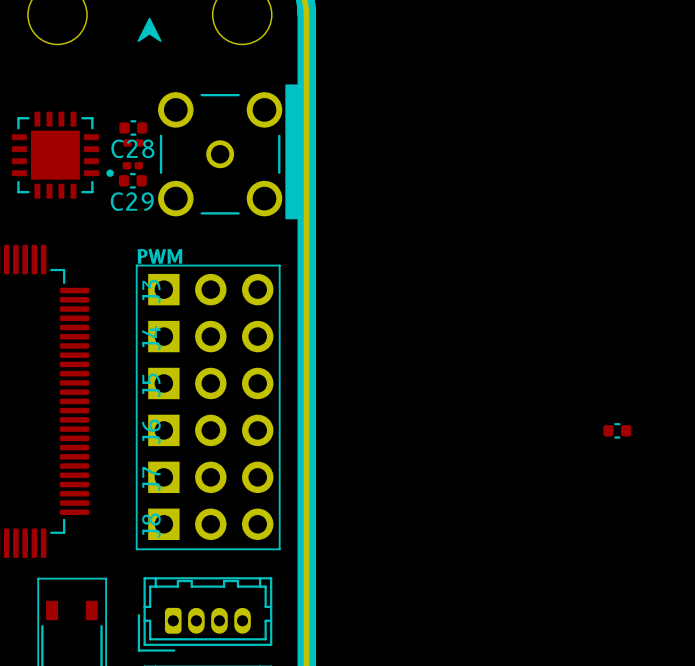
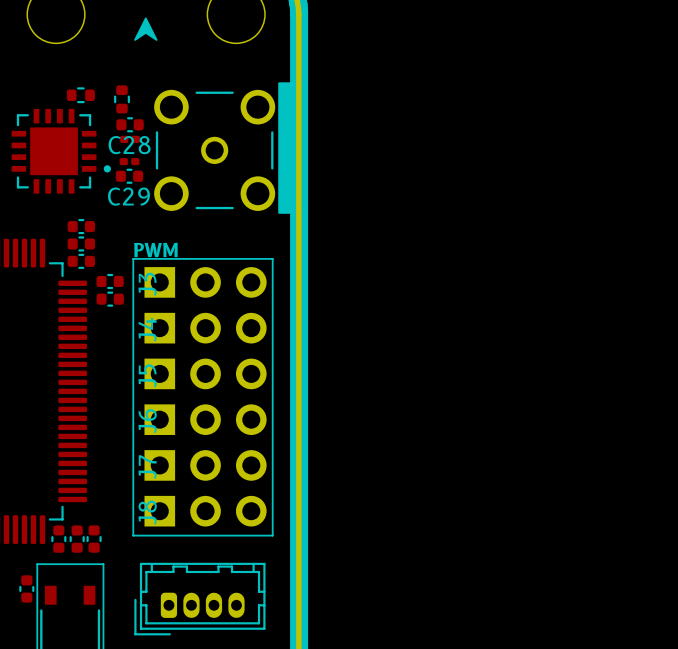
part: none -> (80, 95)
part: none -> (122, 99)
part: none -> (81, 226)
part: none -> (81, 243)
part: none -> (81, 261)
part: none -> (110, 281)
part: none -> (110, 299)
part: (617, 430) -> none
part: none -> (58, 539)
part: none -> (77, 539)
part: none -> (94, 539)
part: none -> (26, 588)

